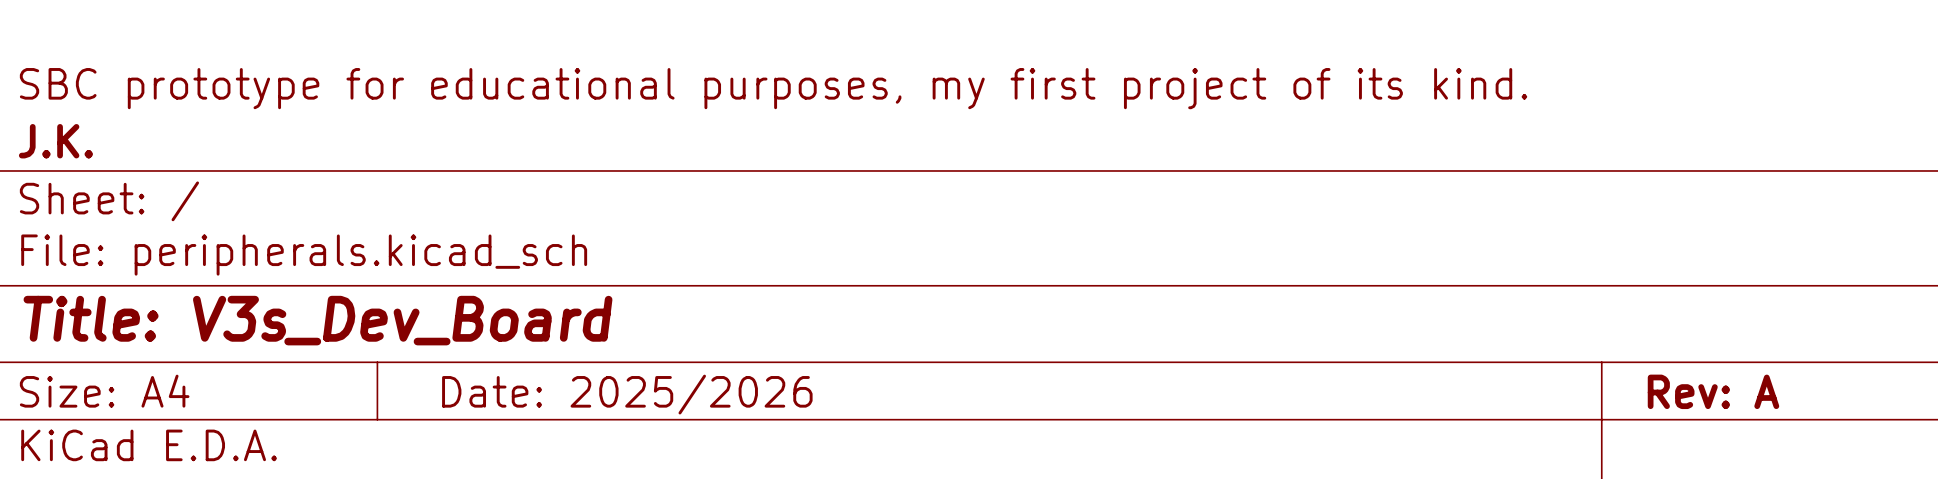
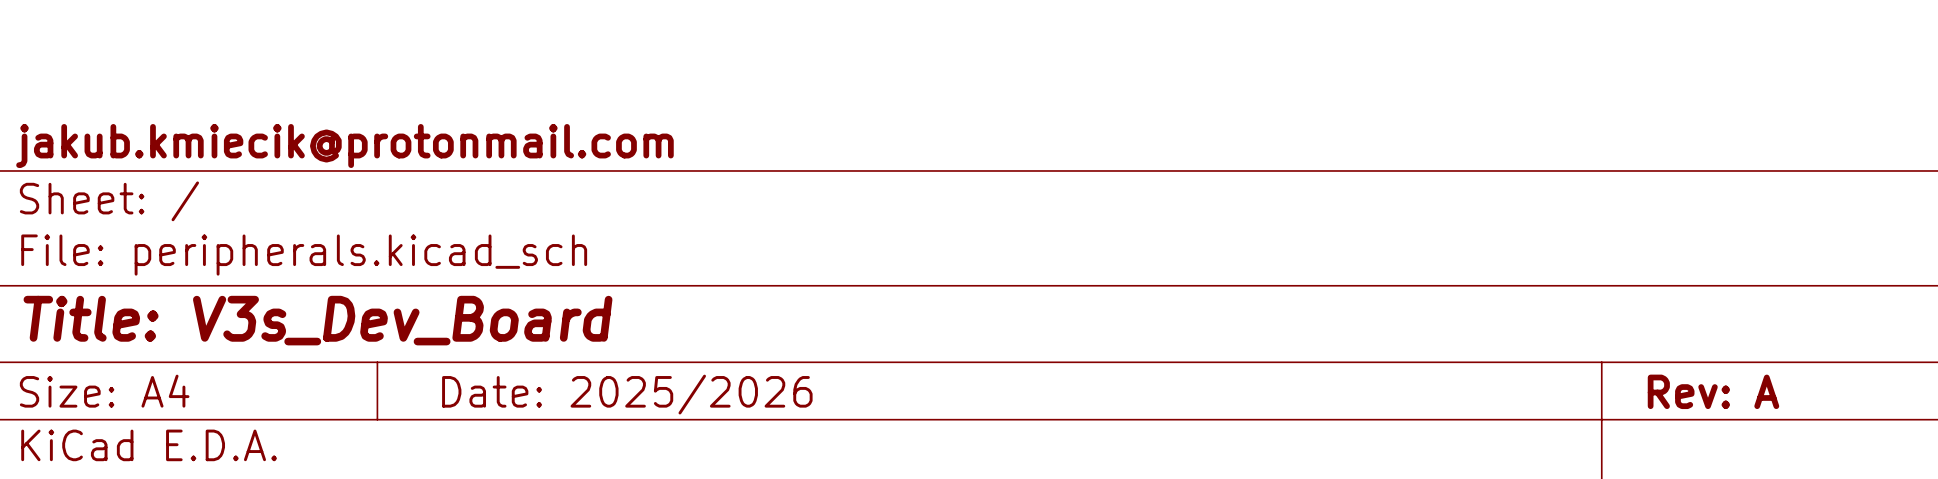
title block: SBC prototype for educational purposes, my first project of its kind. (773, 88) -> none
title block: J.K. (55, 141) -> jakub.kmiecik@protonmail.com (344, 146)

